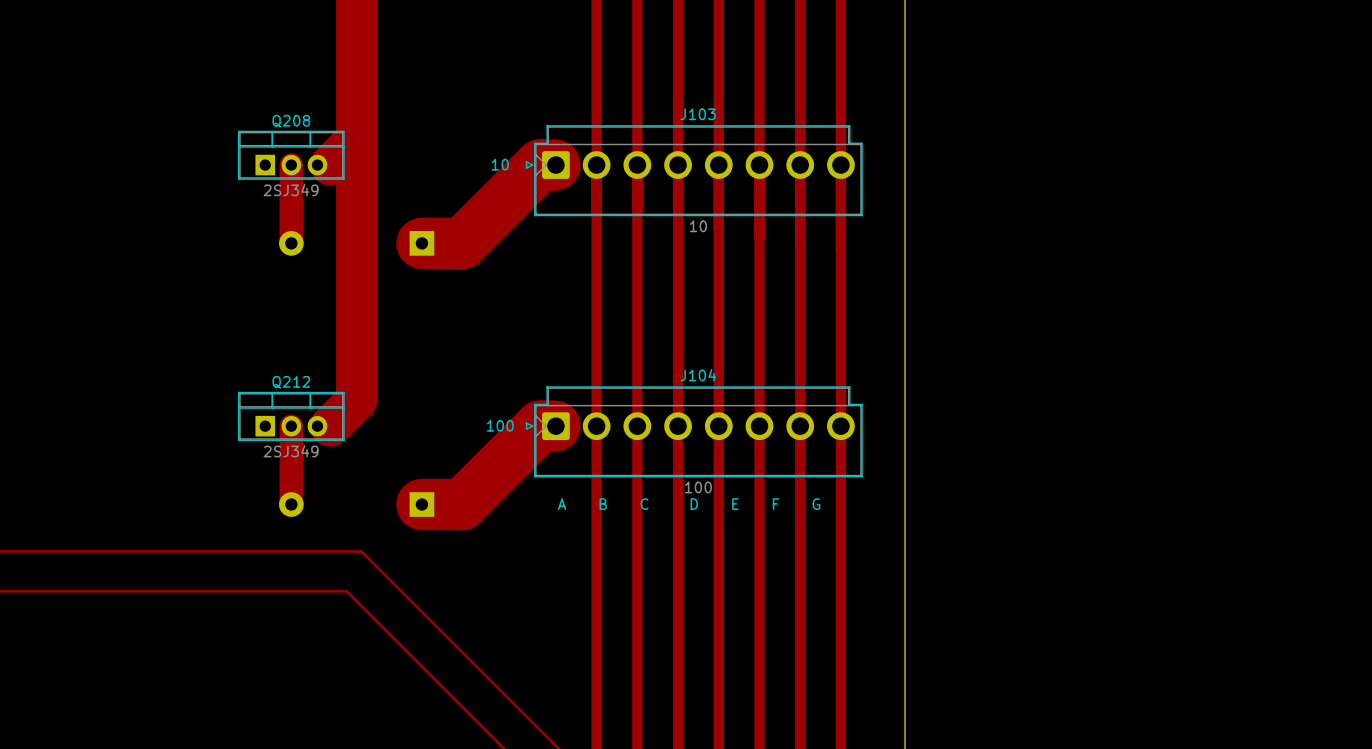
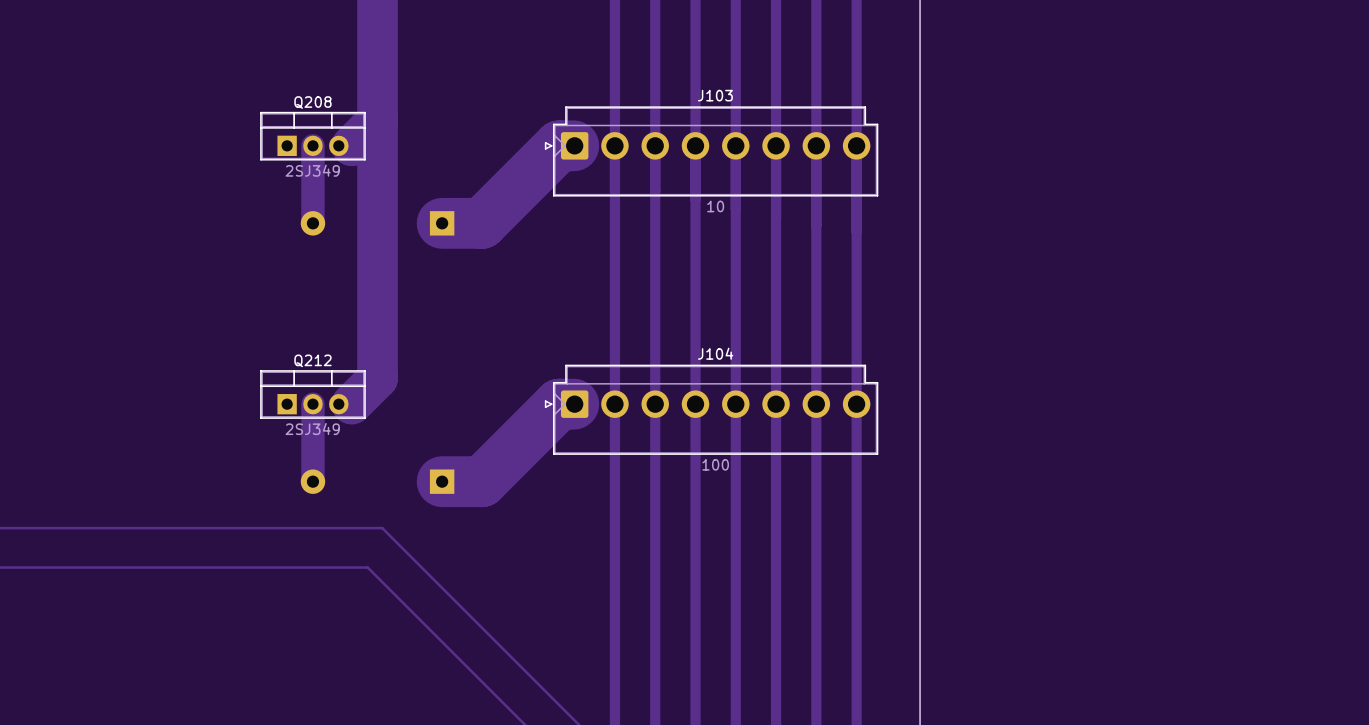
text: 10 (500, 164) -> none
text: 100 (500, 425) -> none
text: A B C D E F G (689, 504) -> none

